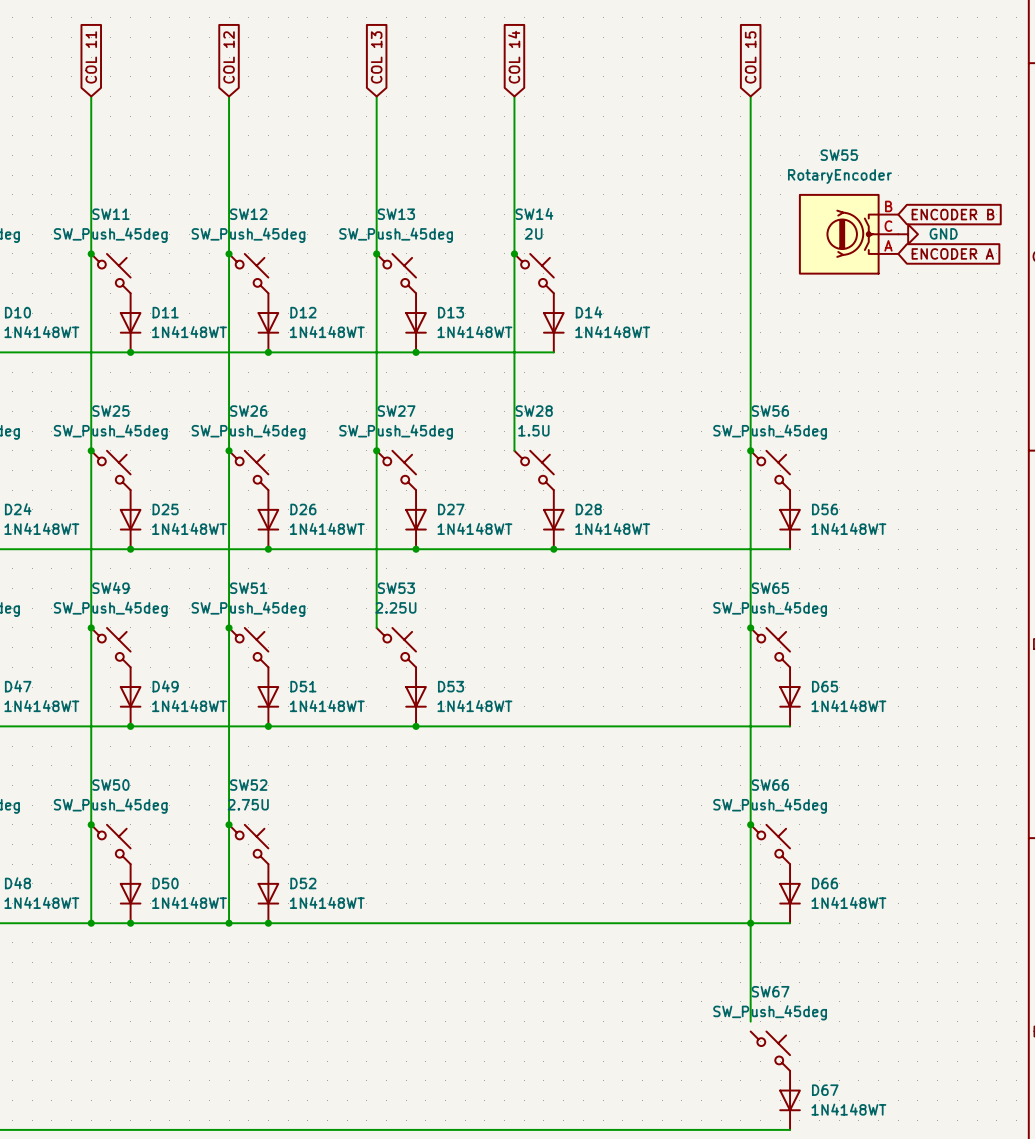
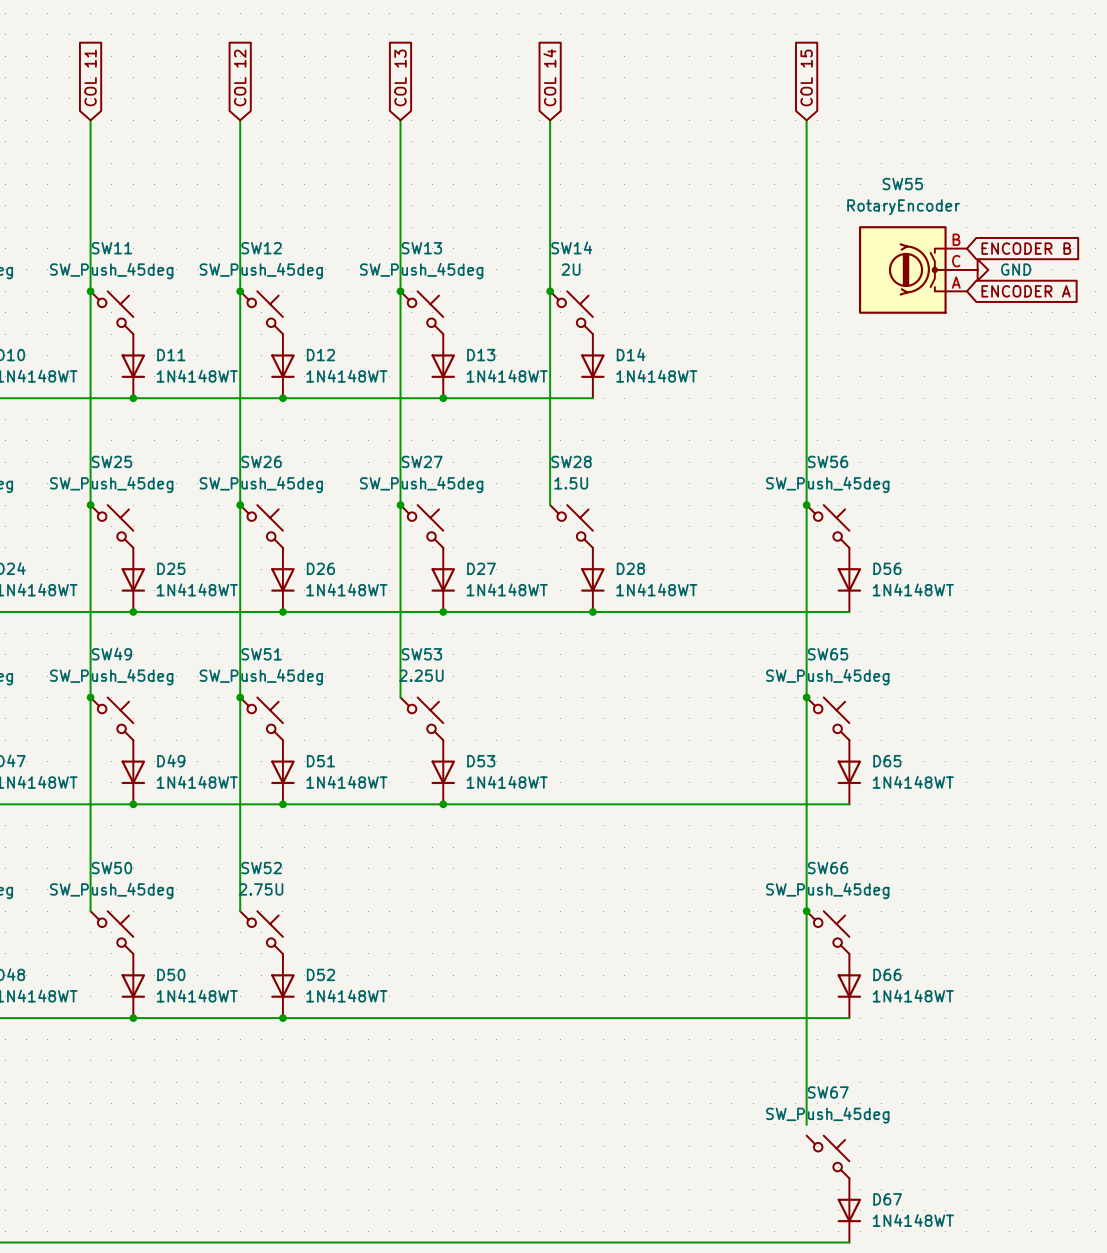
wire: (91, 824) (91, 923) -> none
junction: (91, 824) -> none
wire: (229, 824) (229, 923) -> none
junction: (229, 824) -> none
junction: (91, 923) -> none
junction: (229, 923) -> none
junction: (750, 923) -> none

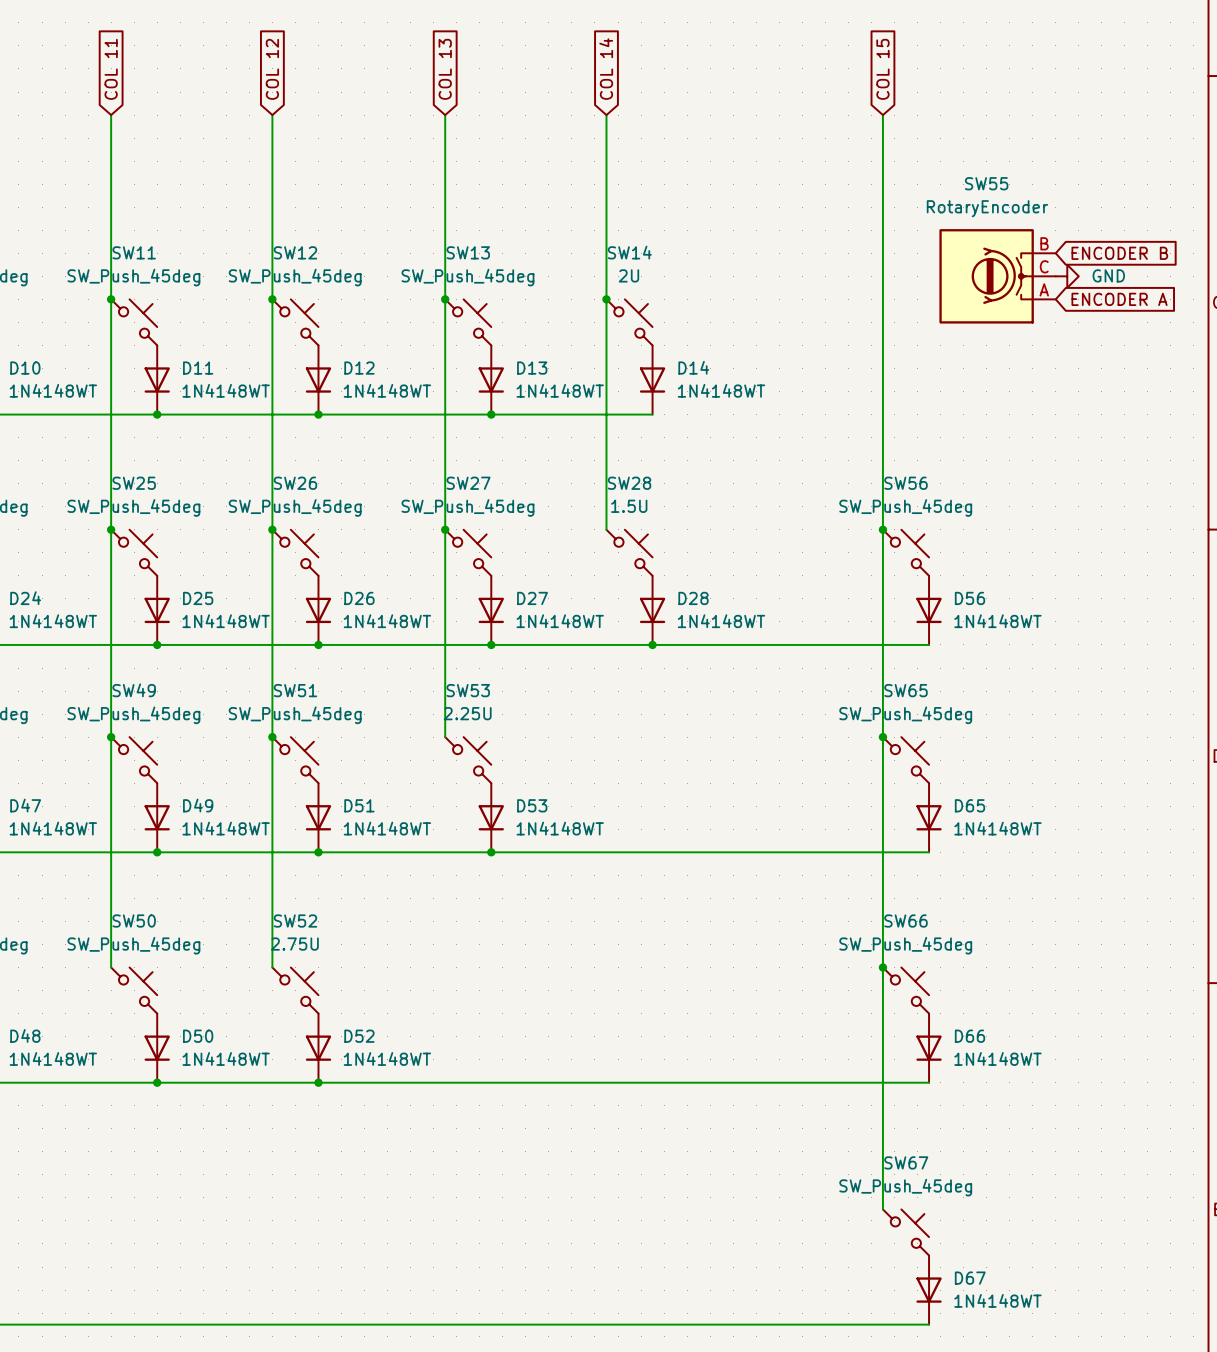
wire: none -> (882, 1197) (882, 1209)

